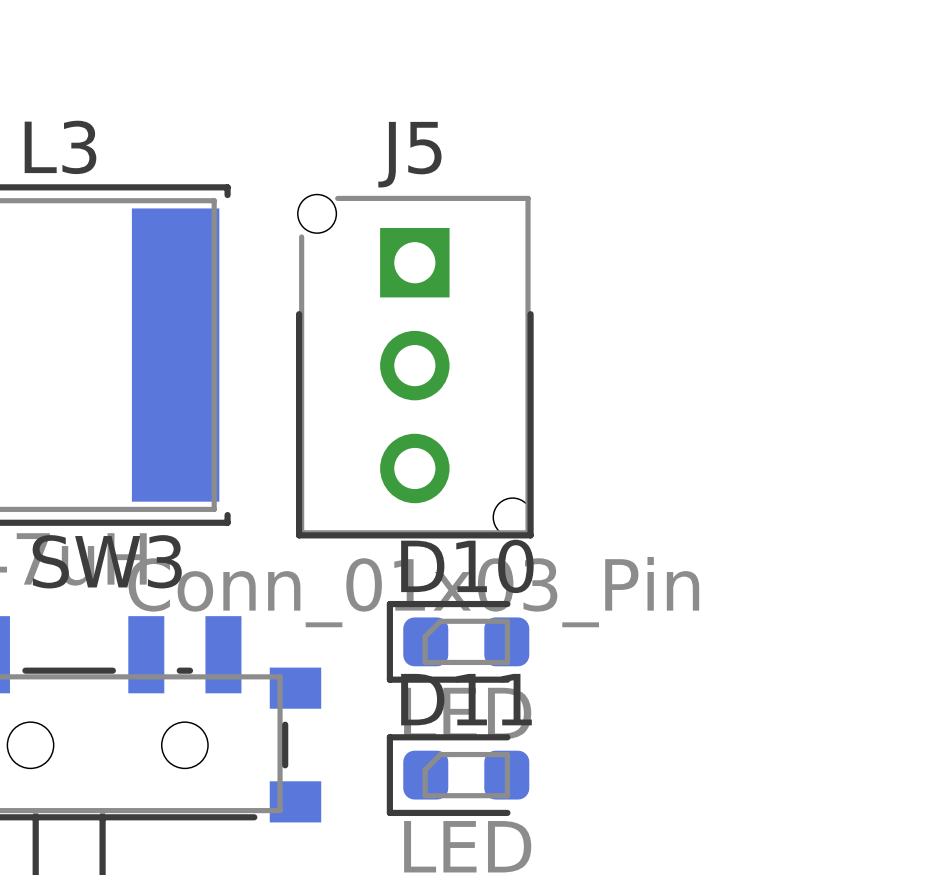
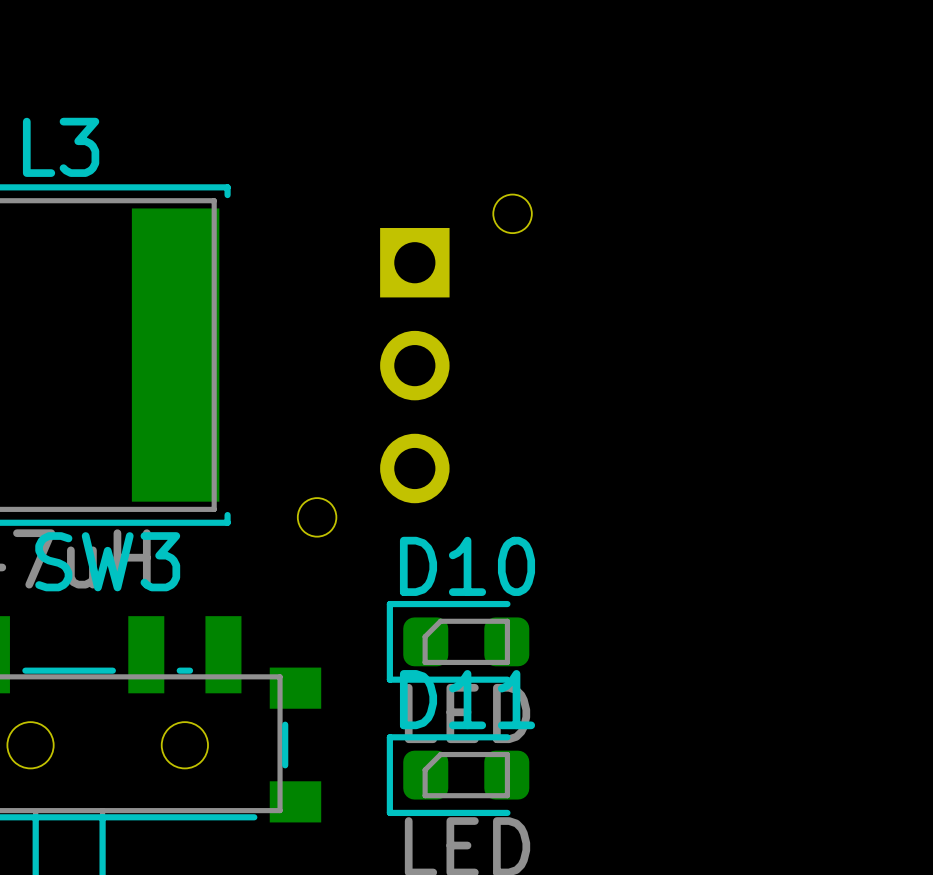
J5 side: bottom (414, 366) -> top (414, 365)

